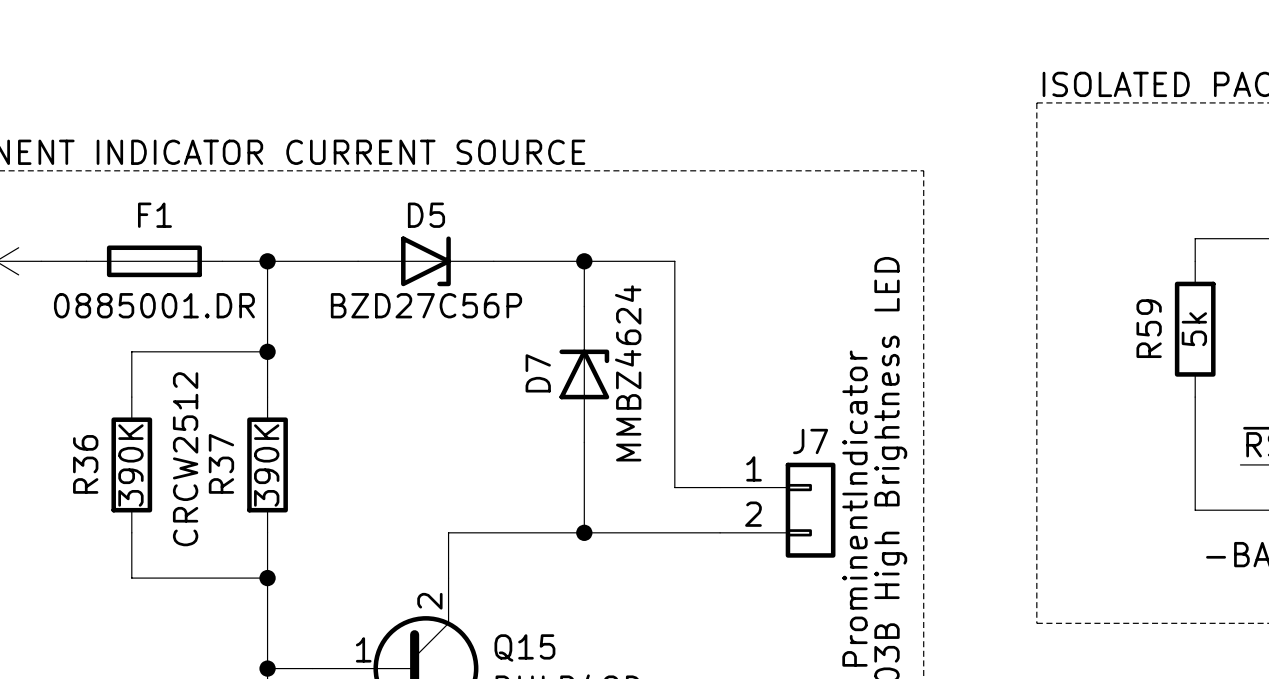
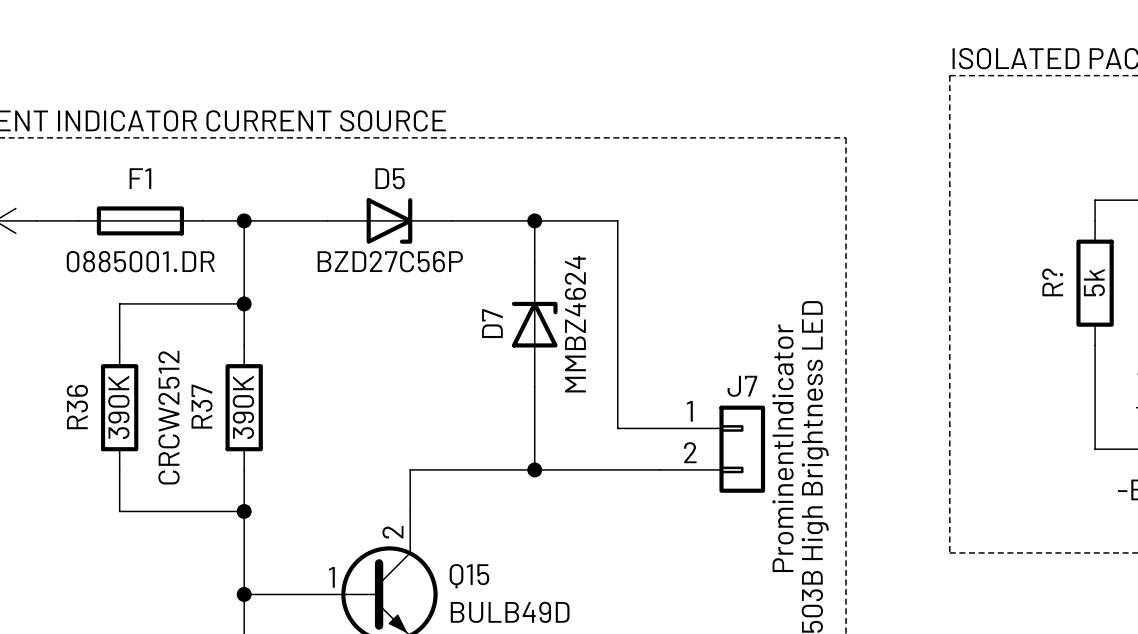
R59 name: R59 (1149, 328) -> R? (1052, 282)

